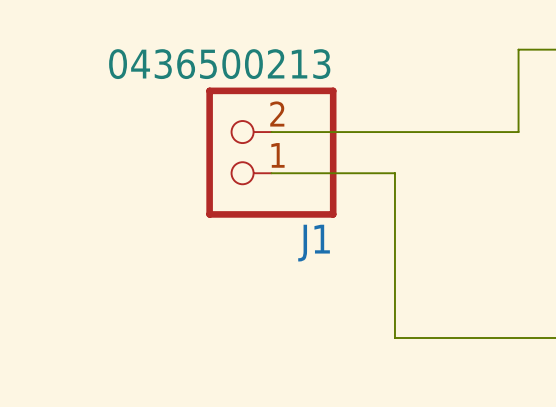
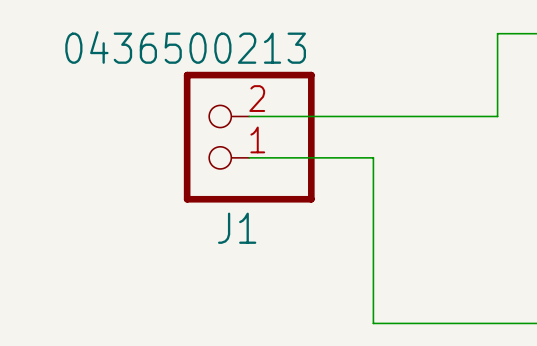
J1 name position: J1 (314, 243) -> J1 (237, 228)

